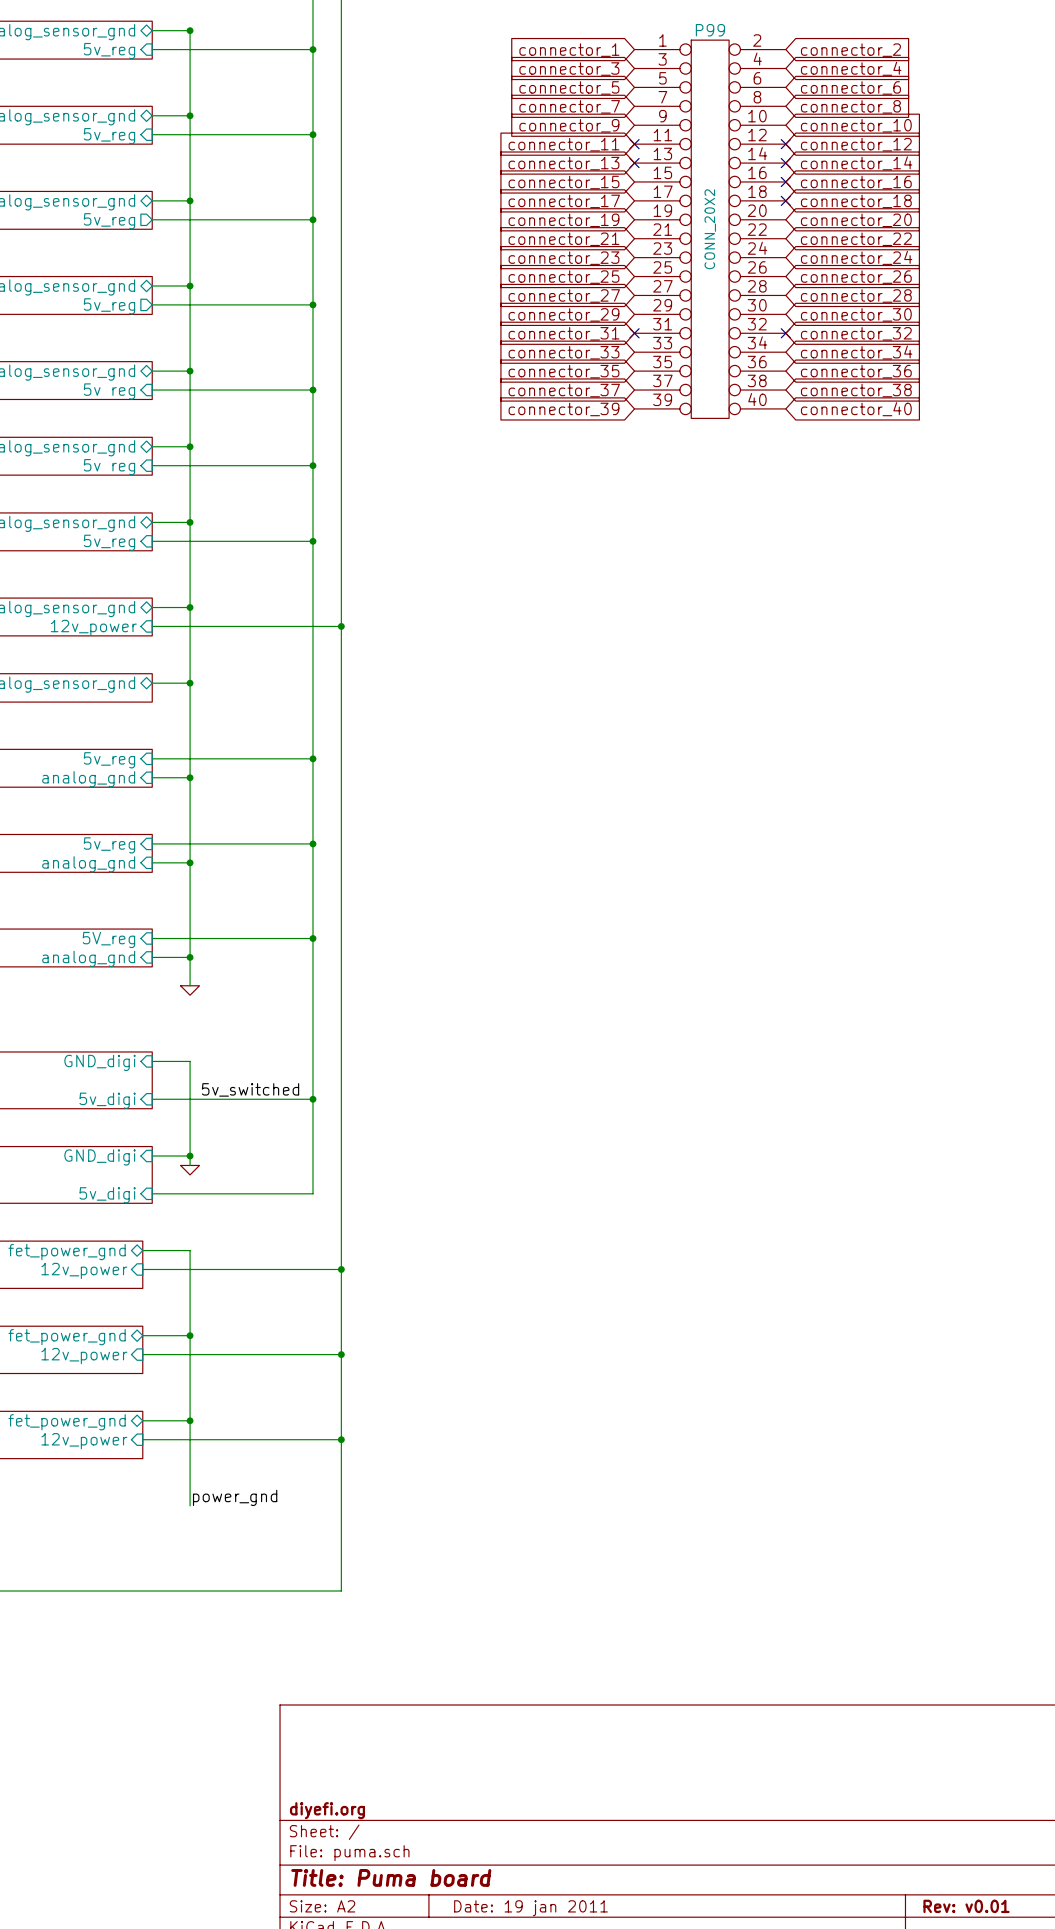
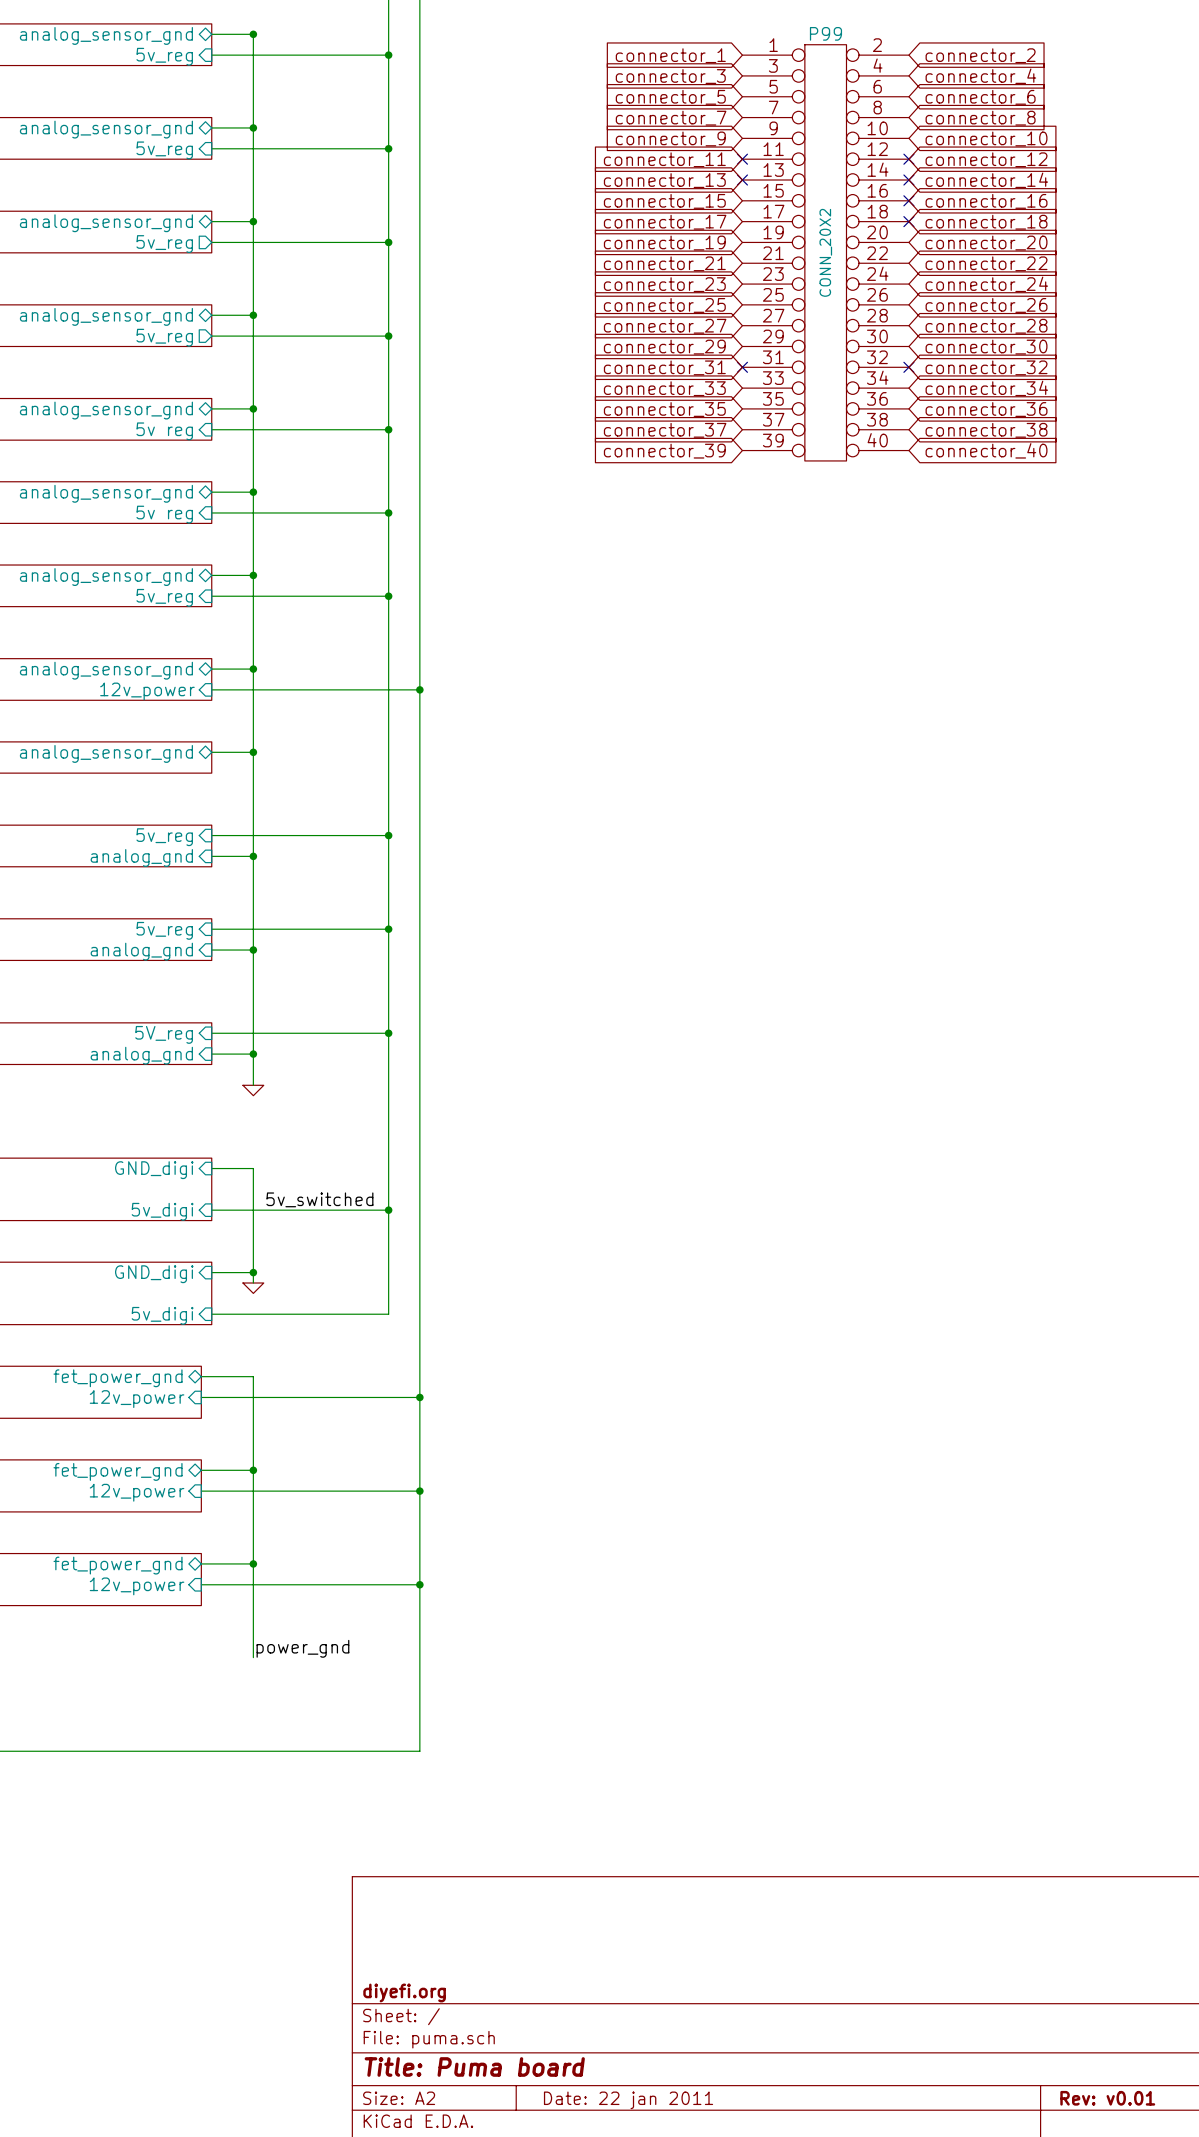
title block: Date: 19 jan 2011 (531, 1908) -> Date: 22 jan 2011 (628, 2100)

